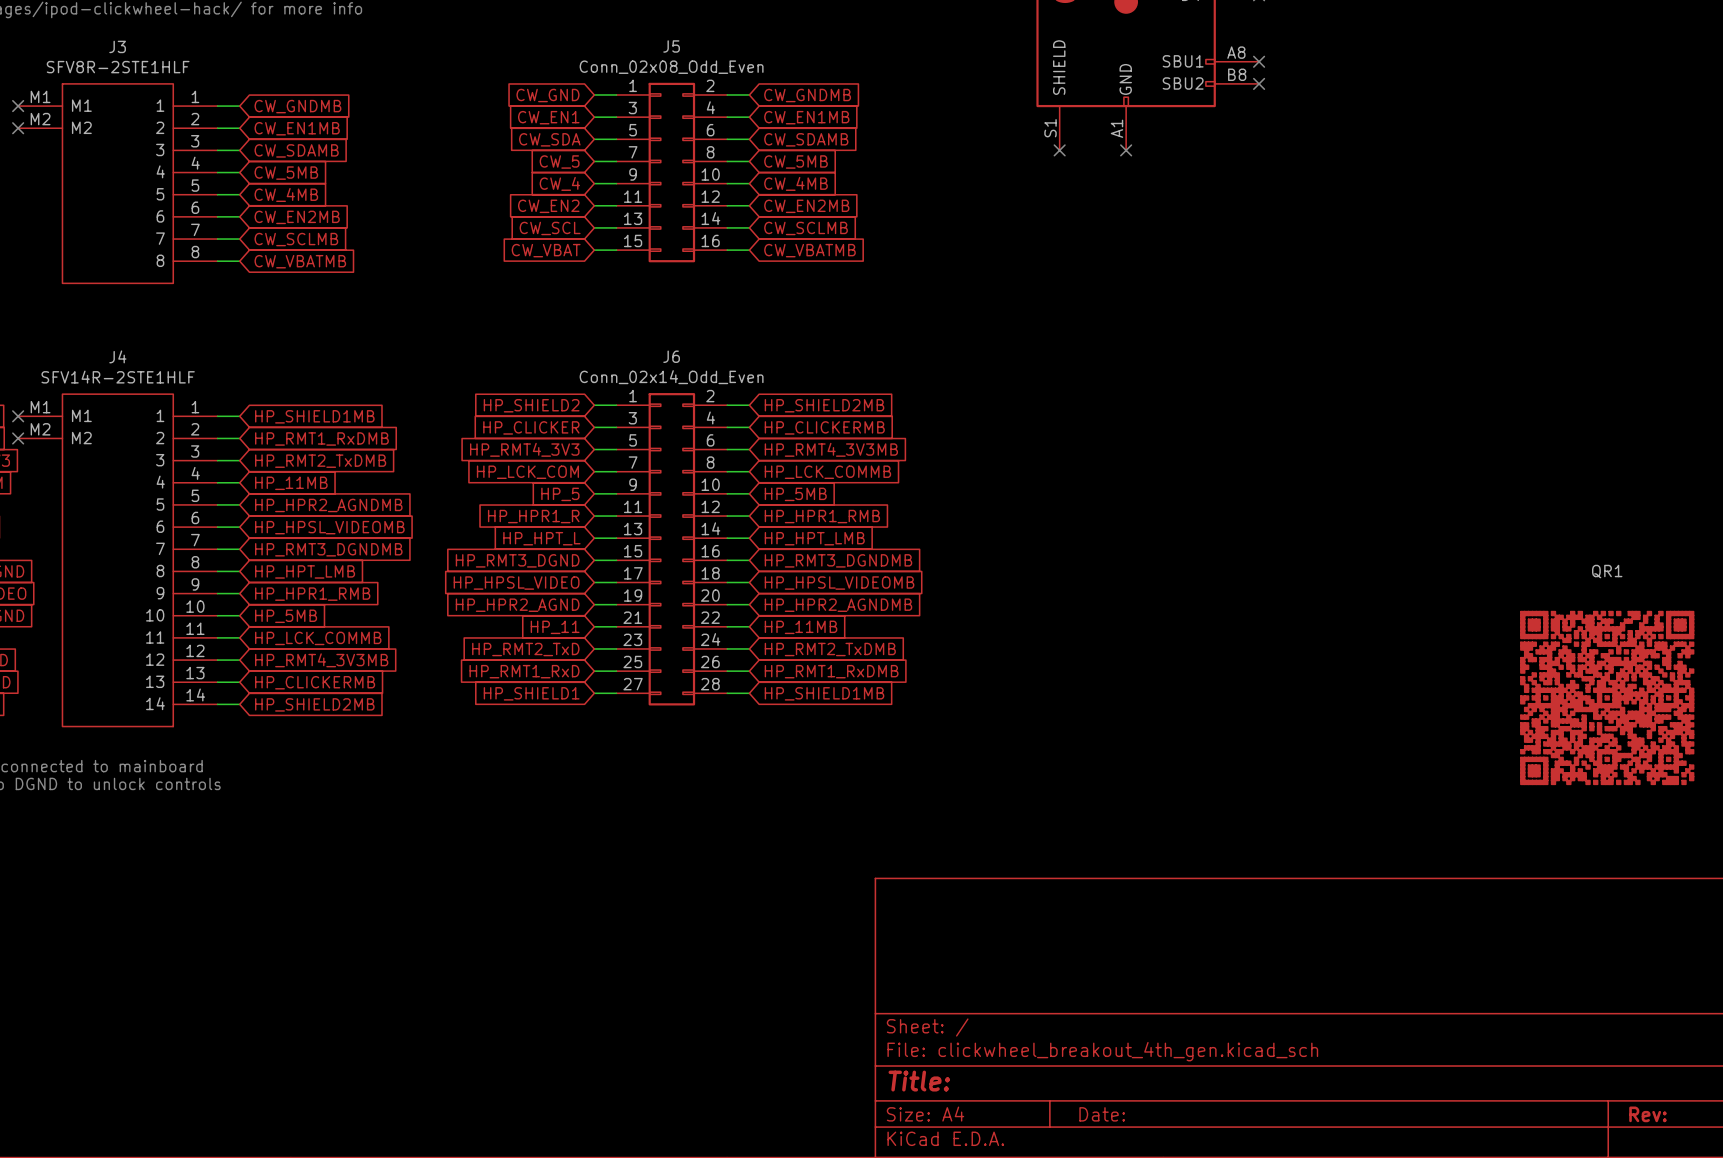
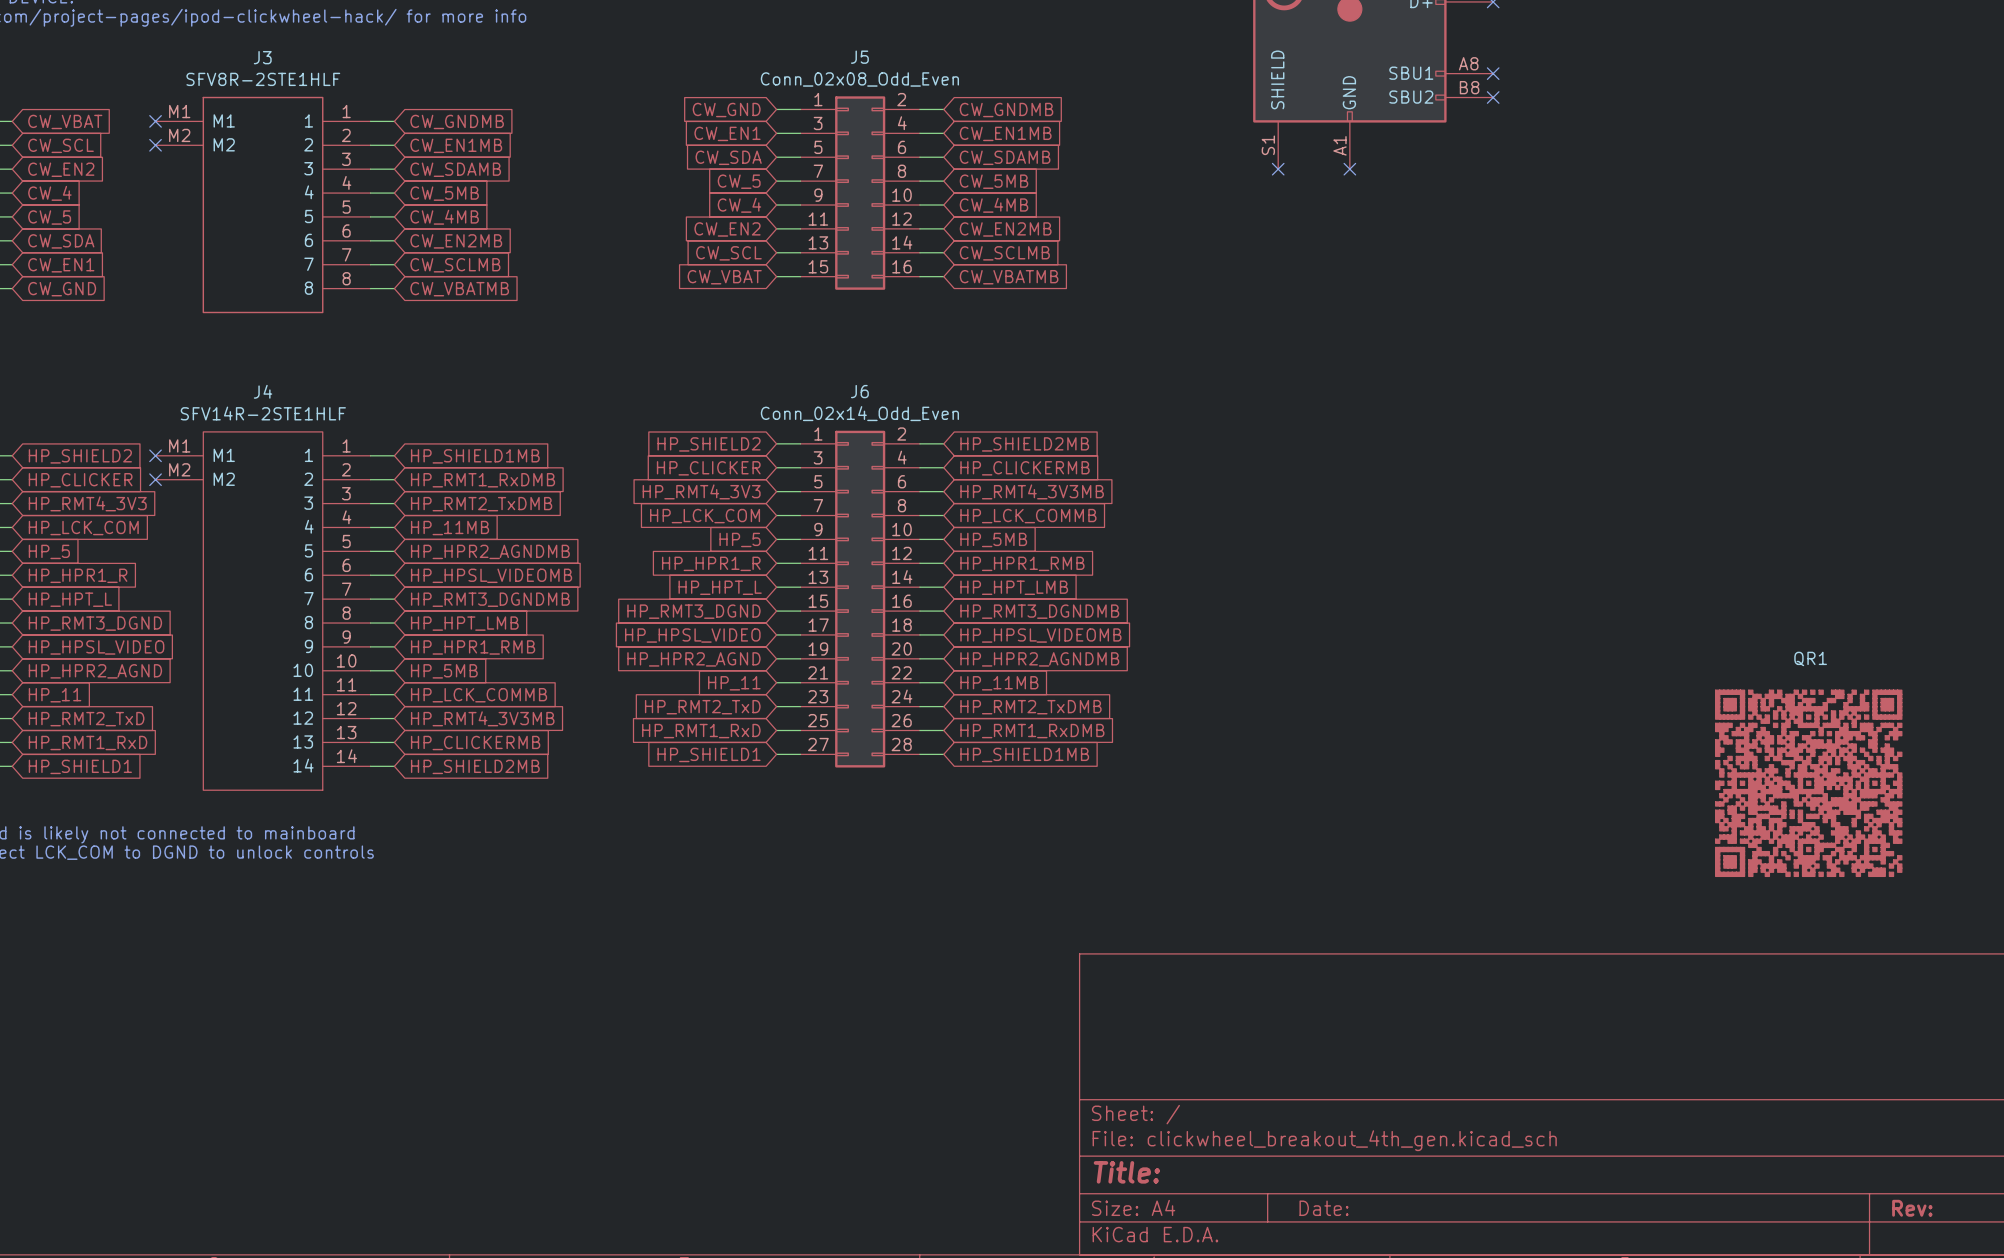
QR1 name position: QR1 (1607, 571) -> QR1 (1810, 658)
QR1 position: (1607, 697) -> (1808, 783)

